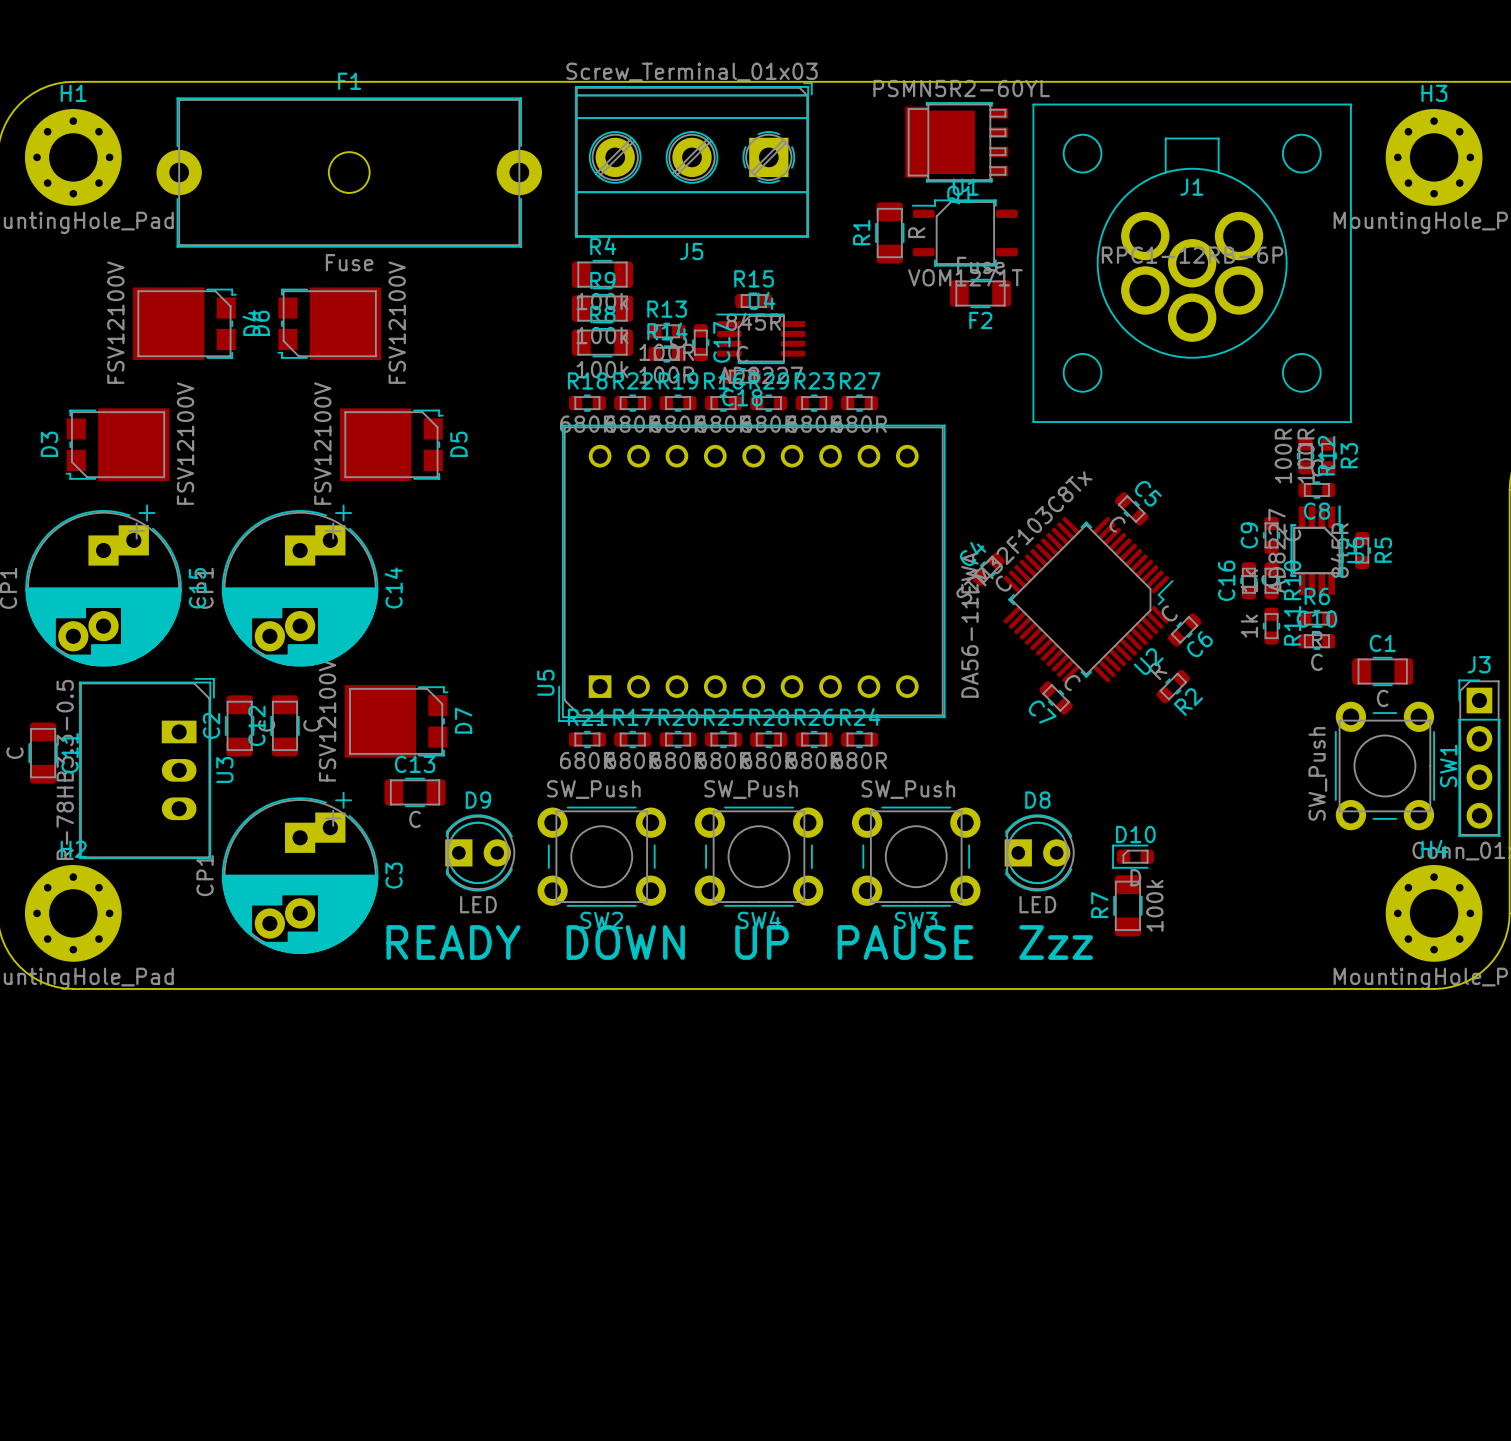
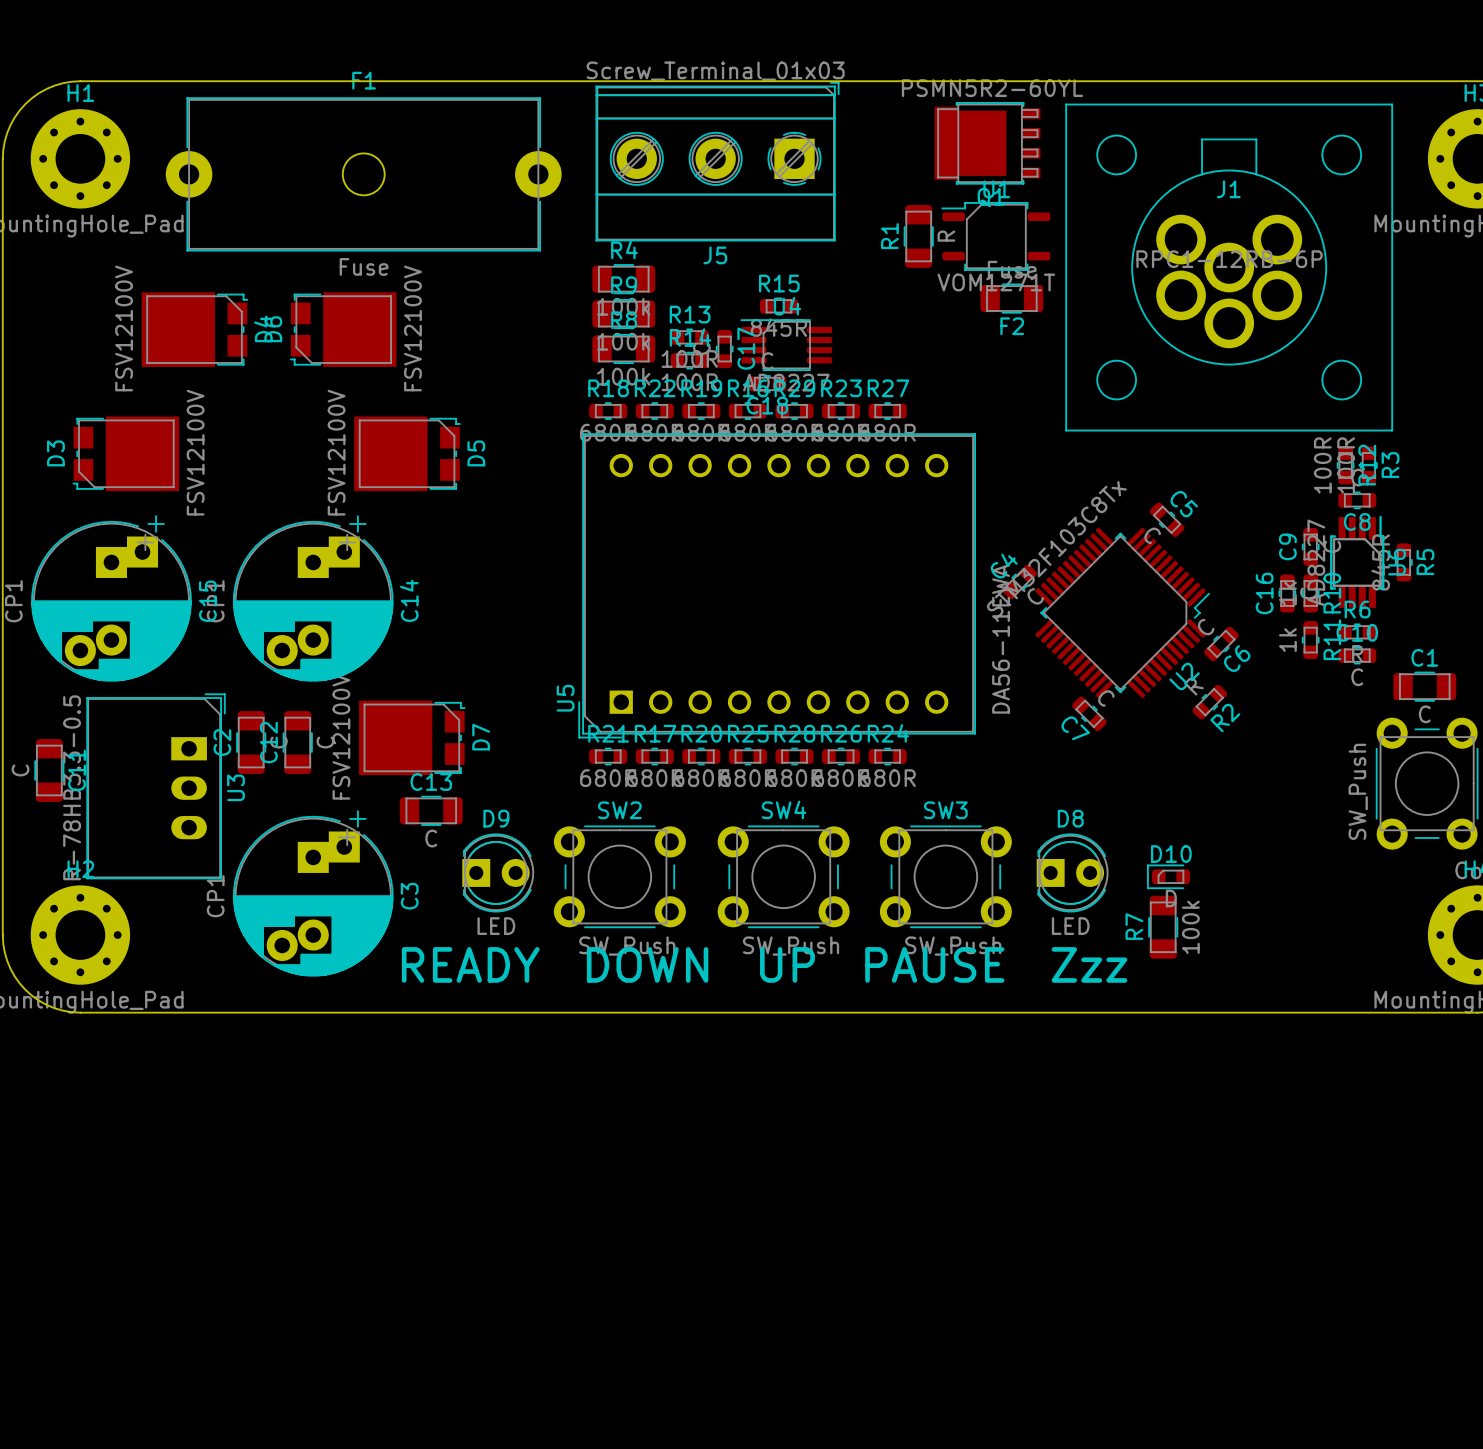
SW2 rotation: 0° (601, 856) -> 180° (619, 876)
SW4 rotation: 0° (758, 856) -> 180° (783, 876)
SW3 rotation: 0° (916, 856) -> 180° (945, 876)

